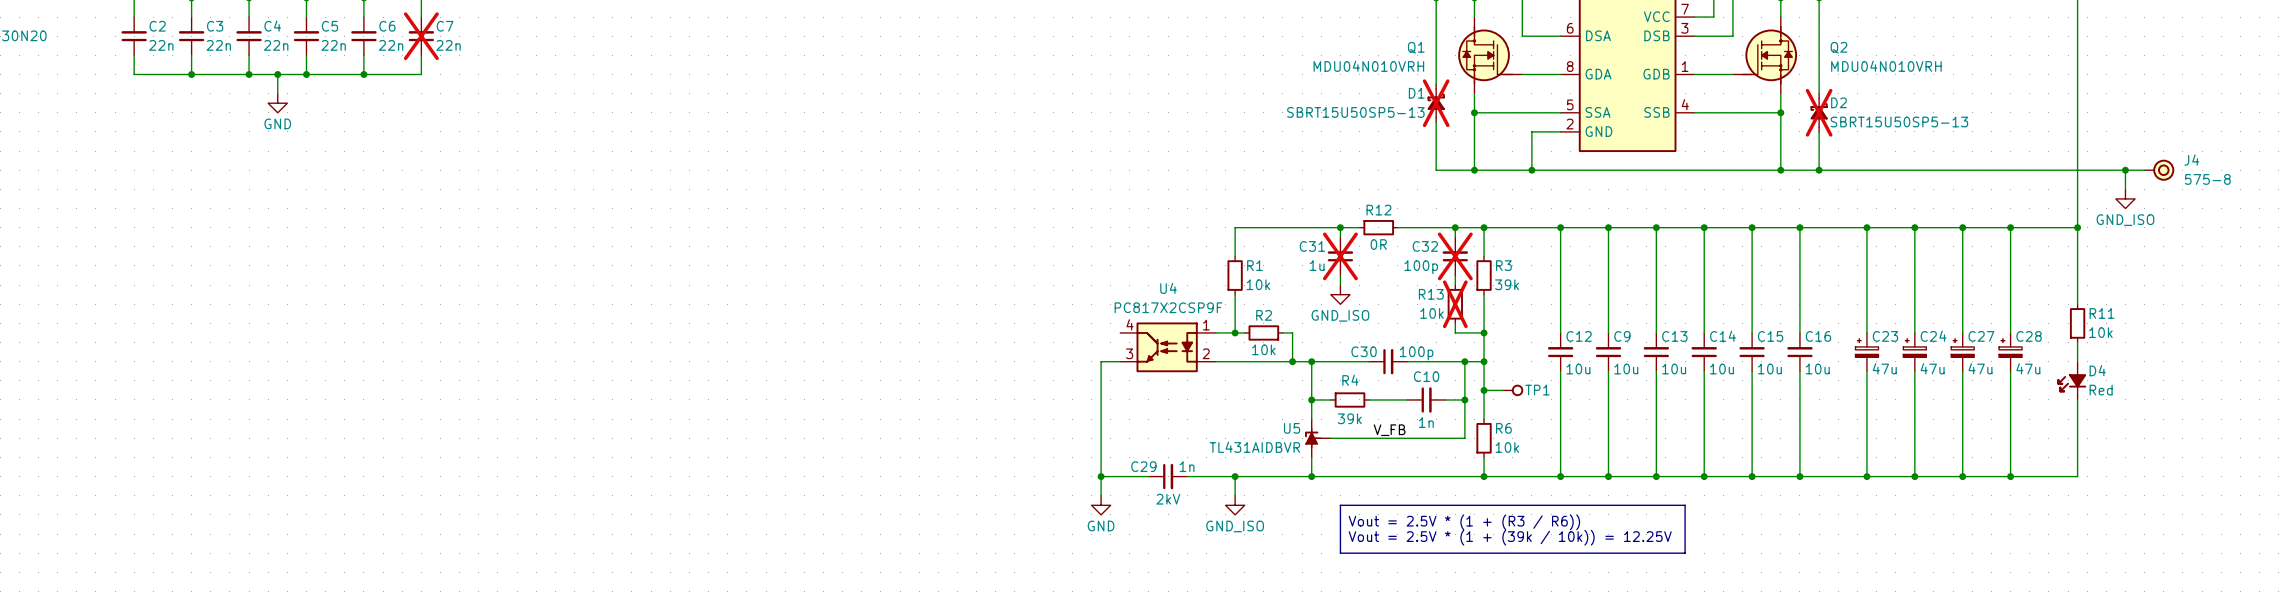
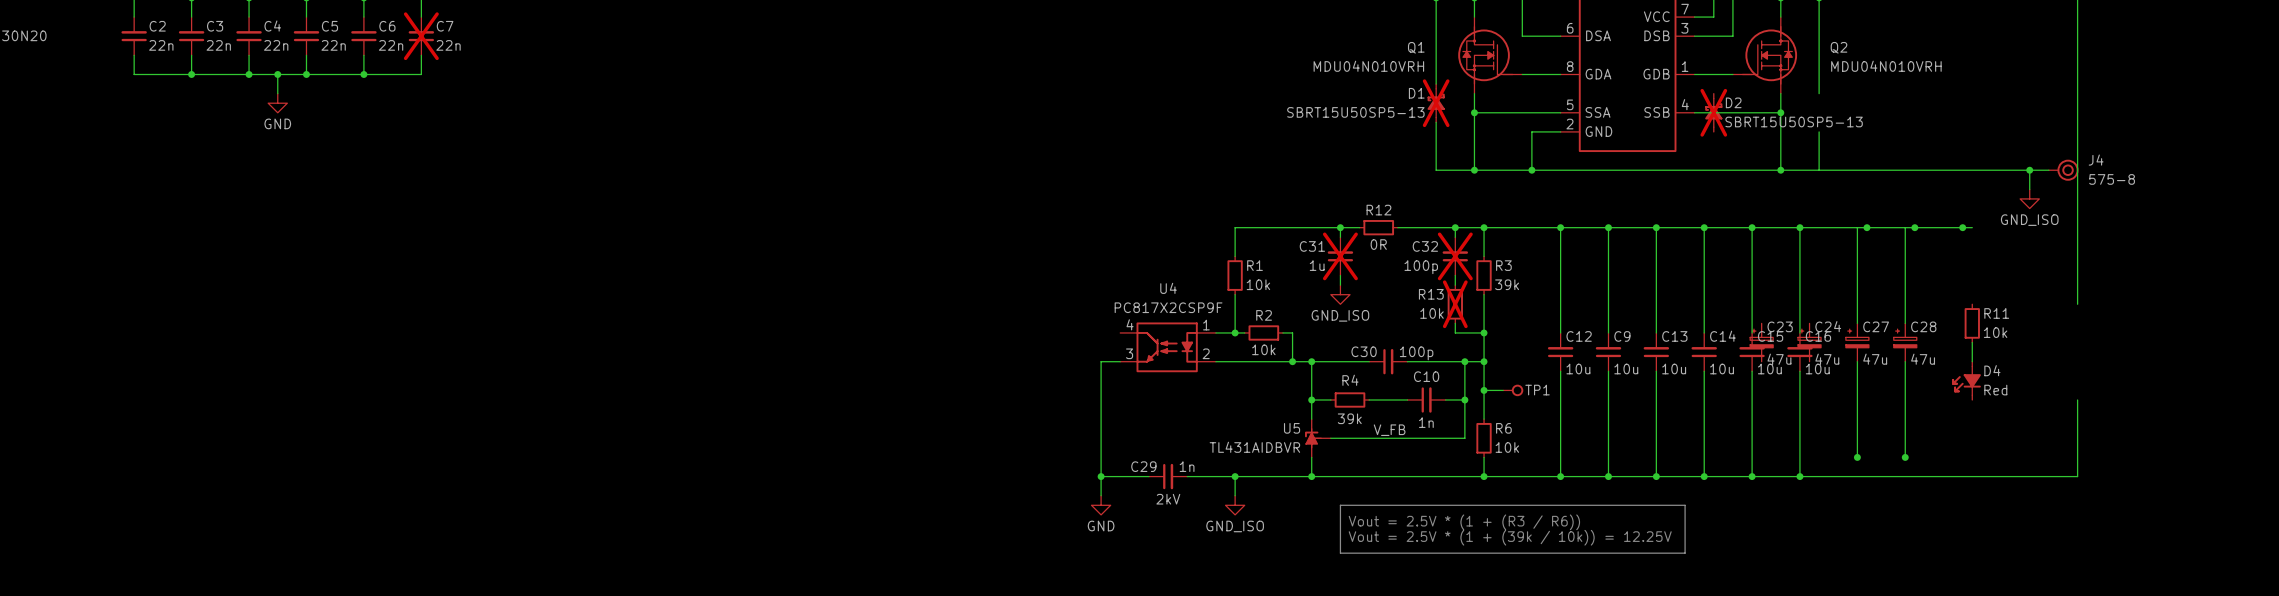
D2 position: (1819, 112) -> (1713, 112)
junction: (1819, 170) -> none
junction: none -> (2029, 170)
wire: (2048, 170) (2144, 170) -> none
wire: (2125, 170) (2125, 189) -> (2029, 170) (2029, 189)
junction: (2125, 170) -> none
J4 position: (2159, 170) -> (2063, 170)
power symbol position: GND_ISO (2125, 198) -> GND_ISO (2029, 198)
wire: none -> (1857, 227) (1857, 323)
wire: (1866, 227) (1866, 332) -> none
wire: none -> (1905, 227) (1905, 323)
wire: (1914, 227) (1914, 332) -> none
wire: (1962, 227) (1962, 332) -> none
wire: (1972, 227) (2077, 227) -> none
wire: (2010, 227) (2010, 332) -> none
junction: (2010, 227) -> none
junction: (2077, 227) -> none
R11 position: (2077, 323) -> (1972, 323)
wire: (2077, 342) (2077, 361) -> (1972, 342) (1972, 361)
C23 position: (1866, 352) -> (1761, 342)
C24 position: (1914, 352) -> (1809, 342)
C27 position: (1962, 352) -> (1857, 342)
C28 position: (2010, 352) -> (1905, 342)
wire: none -> (1857, 361) (1857, 457)
wire: none -> (1905, 361) (1905, 457)
wire: (1866, 371) (1866, 476) -> none
wire: (1914, 371) (1914, 476) -> none
wire: (1962, 371) (1962, 476) -> none
wire: (2010, 371) (2010, 476) -> none
D4 position: (2071, 380) -> (1966, 380)
junction: none -> (1857, 457)
junction: none -> (1905, 457)
junction: (1866, 476) -> none
junction: (1914, 476) -> none
junction: (1962, 476) -> none
junction: (2010, 476) -> none

